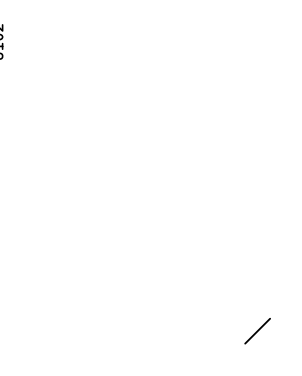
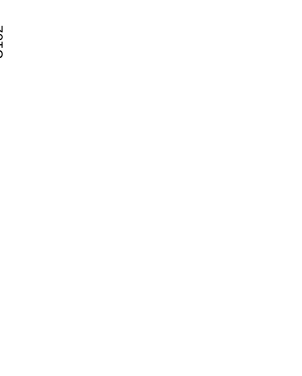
board edge: (270, 318) (245, 343) -> none

